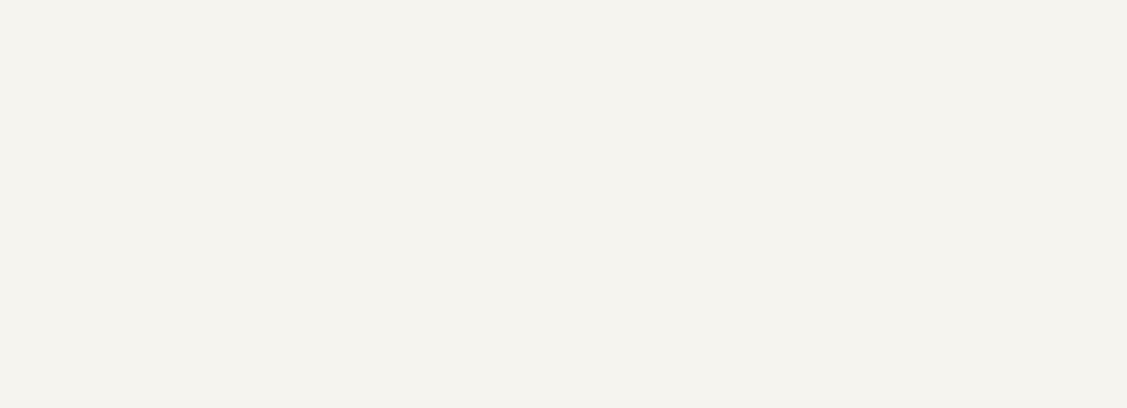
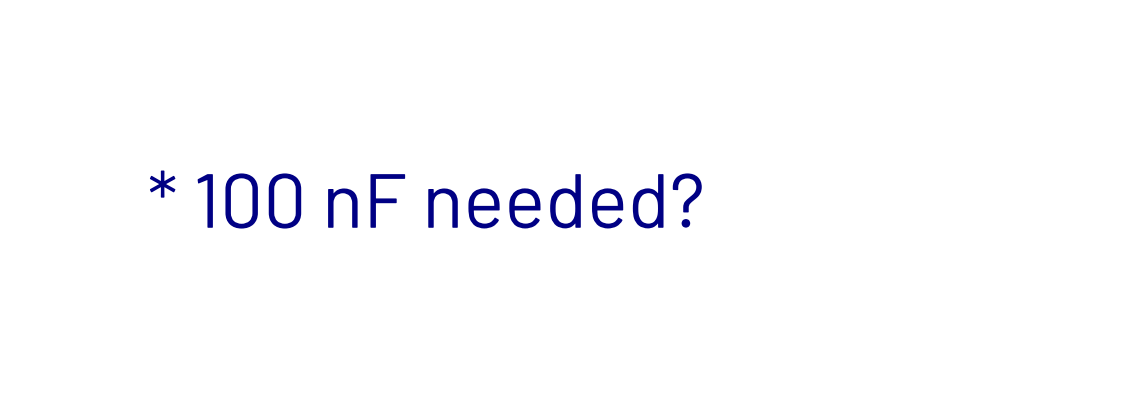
text: none -> * 100 nF needed? (425, 199)

